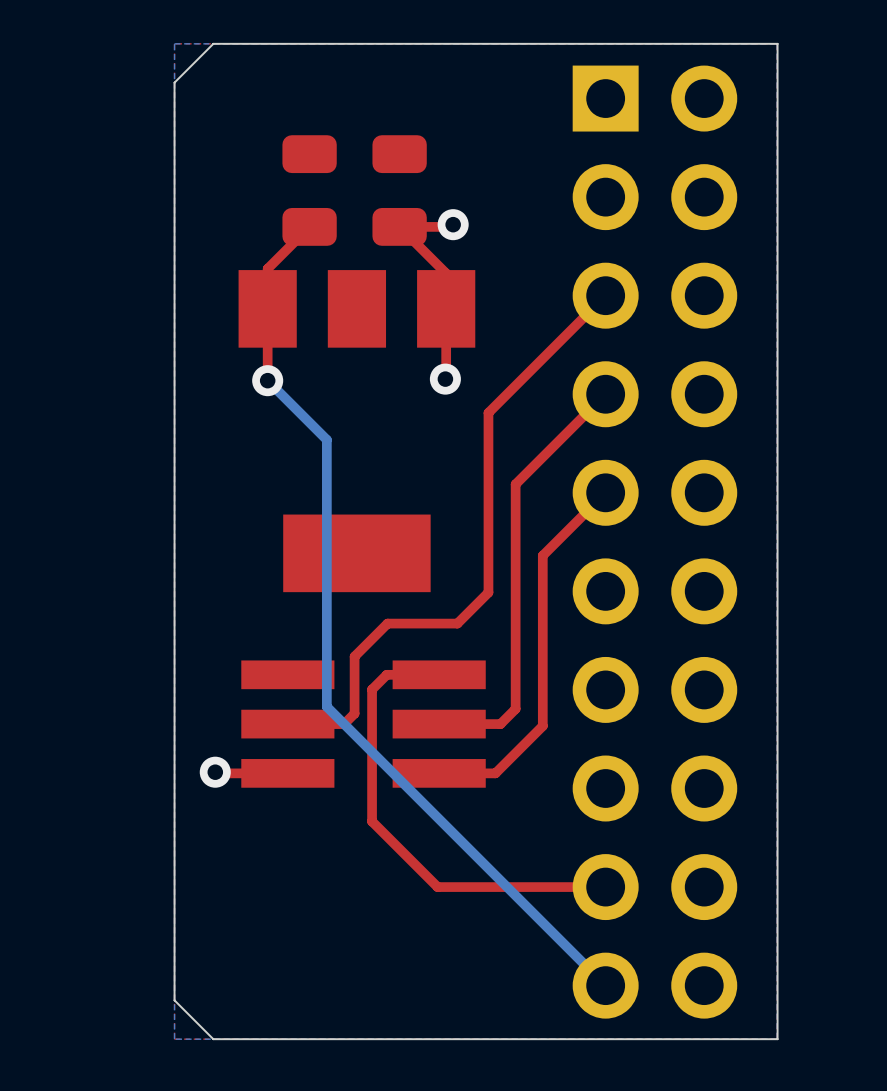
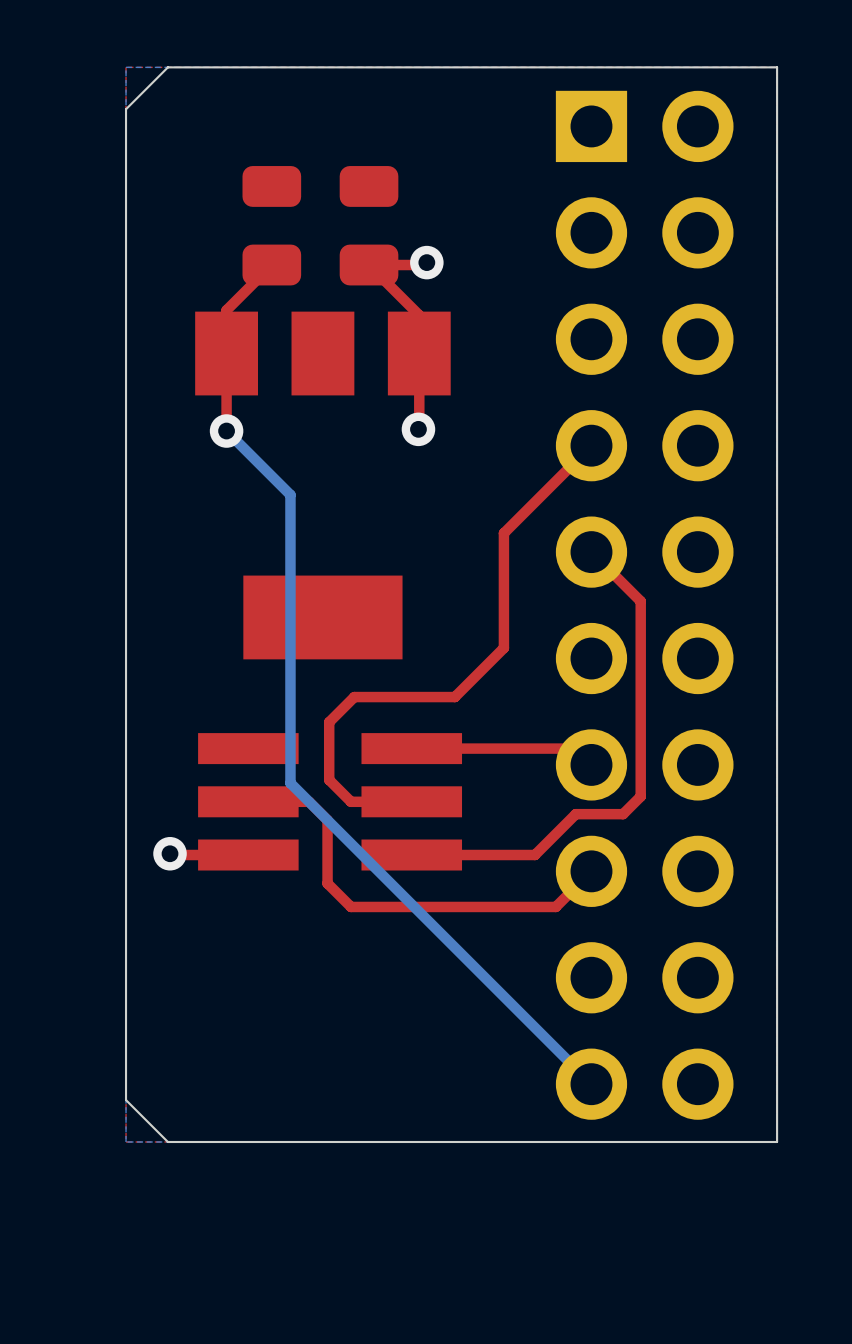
top track: (605, 295) (488, 412) (488, 592) (457, 623) (387, 623) (354, 656) (354, 713) (344, 724) -> (591, 871) (555, 906) (351, 906) (327, 883) (327, 820) (309, 801)
top track: (524, 475) (515, 484) (515, 708) (500, 724) (439, 724) -> (503, 533) (503, 648) (454, 697) (354, 697) (329, 722) (329, 780) (351, 801) (411, 801)
top track: (605, 492) (542, 555) (542, 726) (495, 773) -> (591, 552) (640, 601) (640, 796) (623, 814) (575, 814) (534, 855) (472, 855)
top track: (439, 674) (386, 674) (372, 689) (372, 821) (437, 887) (605, 887) -> (411, 748) (575, 748) (591, 764)

